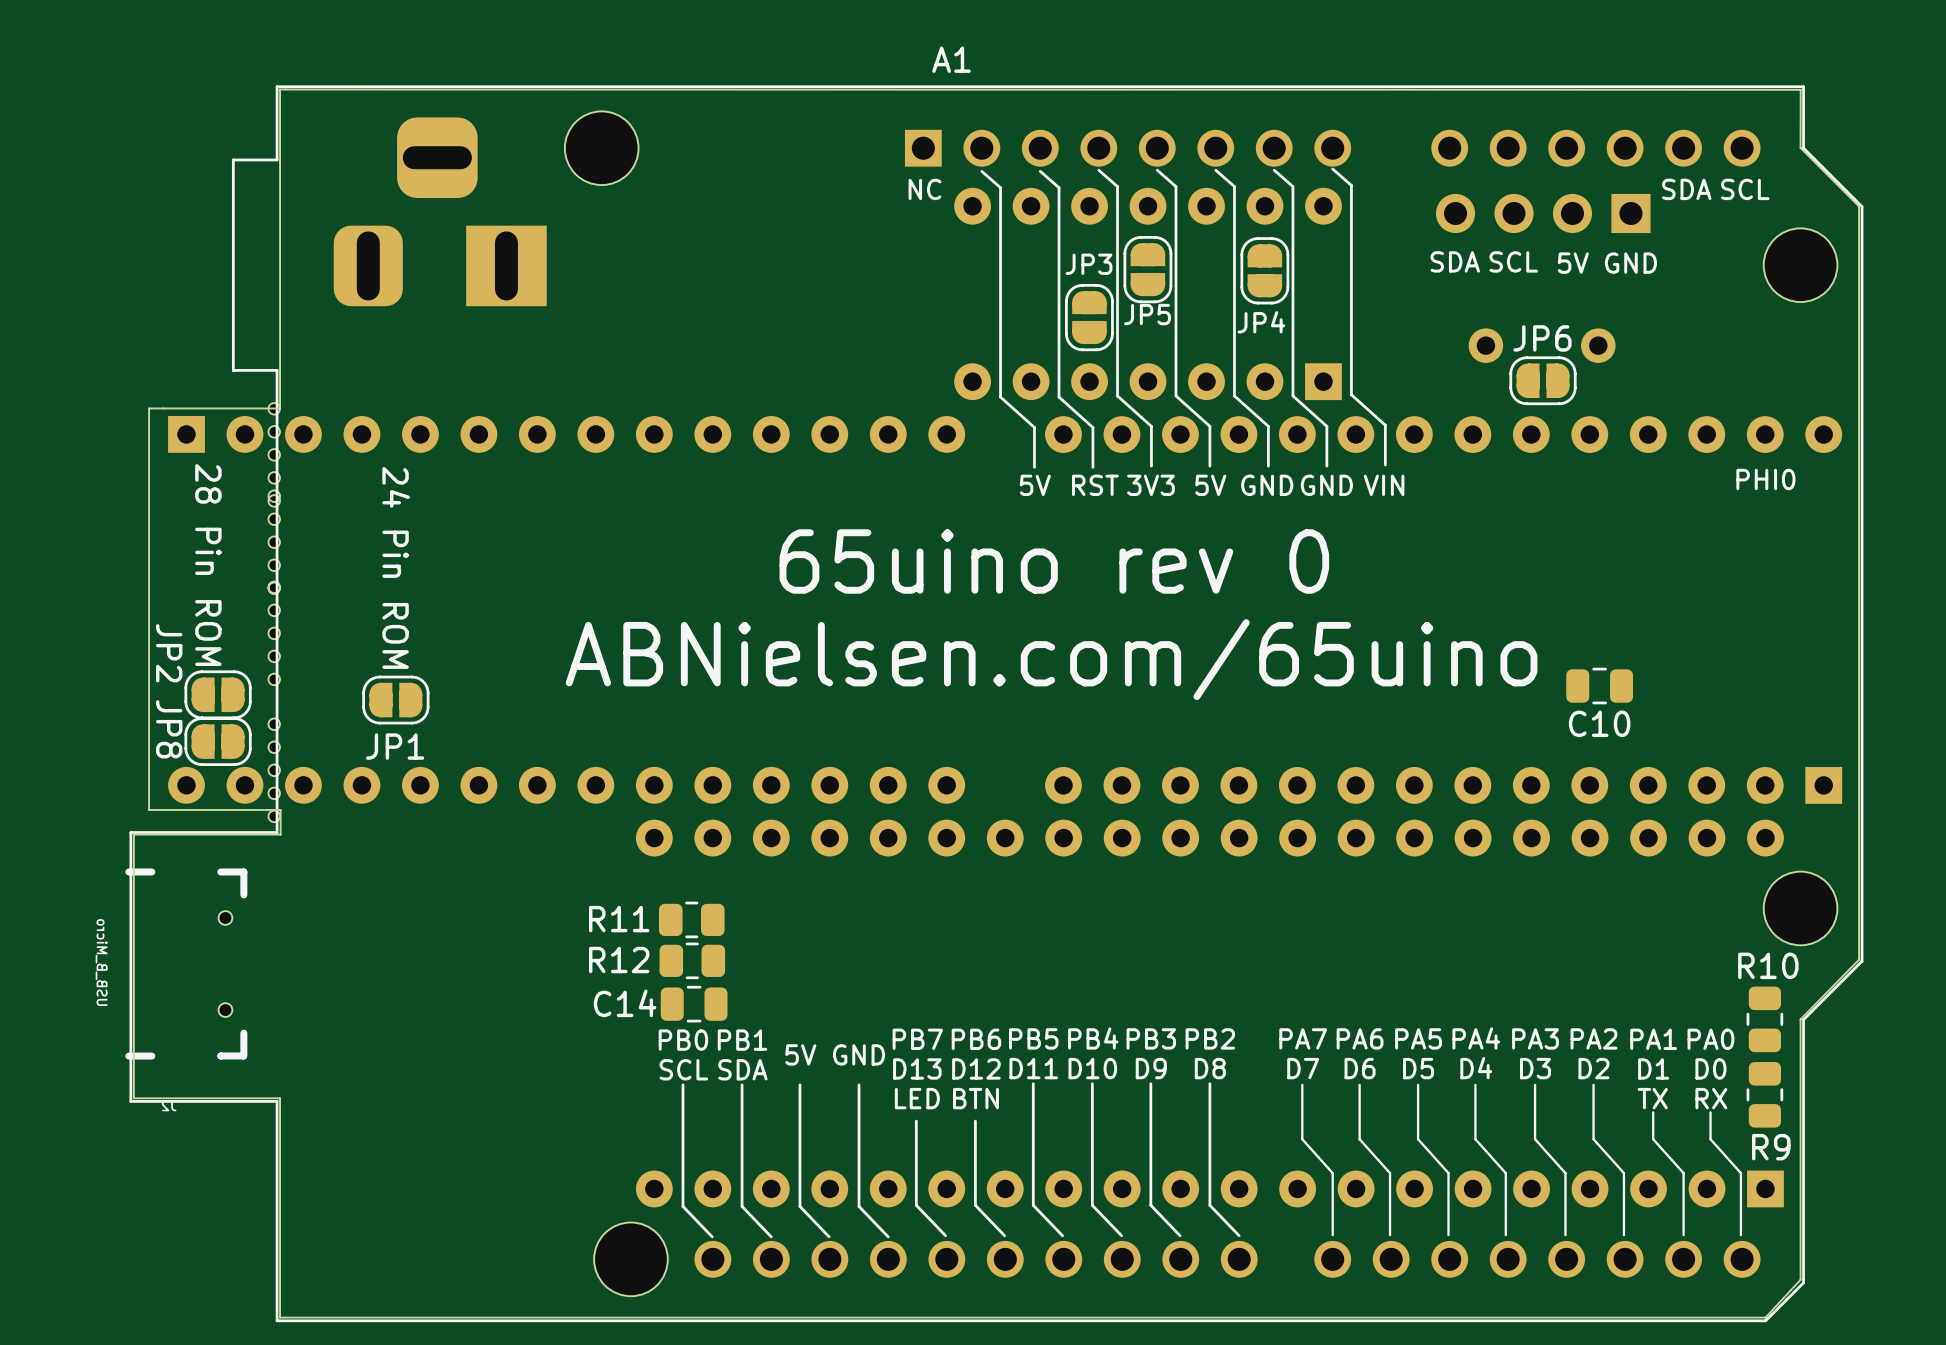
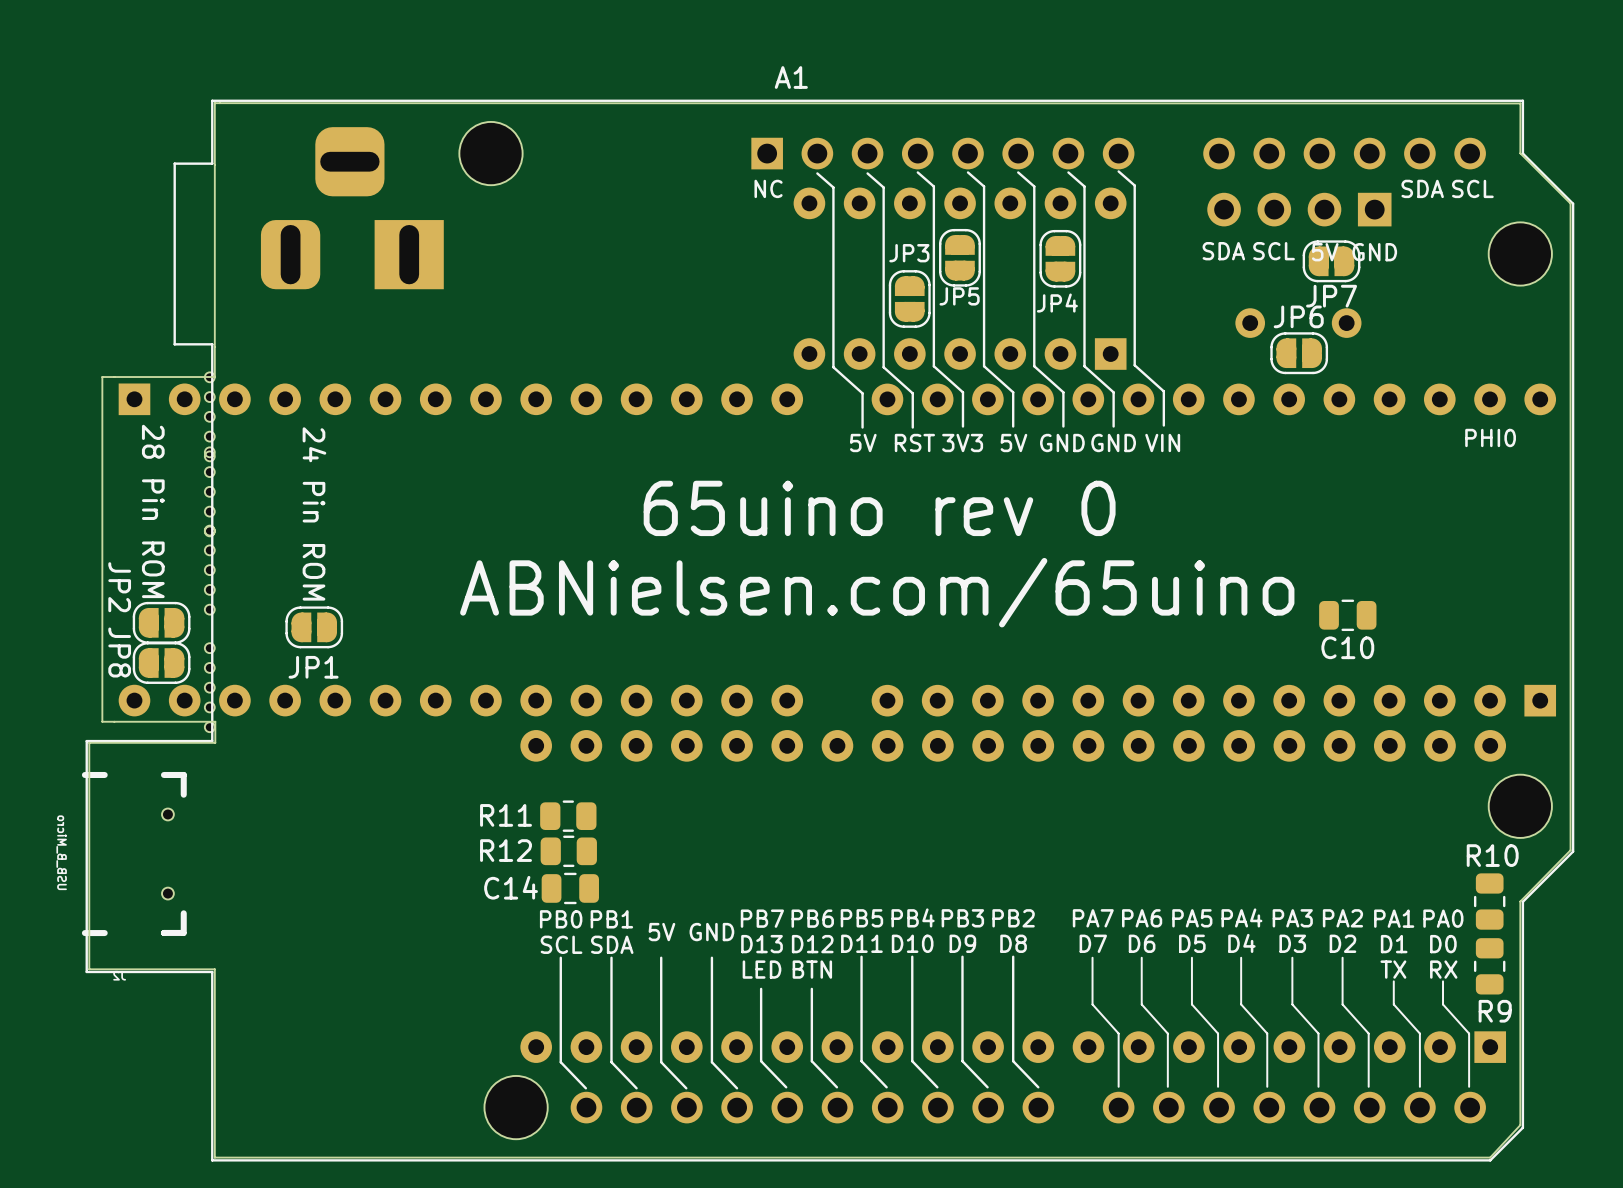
JP7: none -> (1331, 261)

